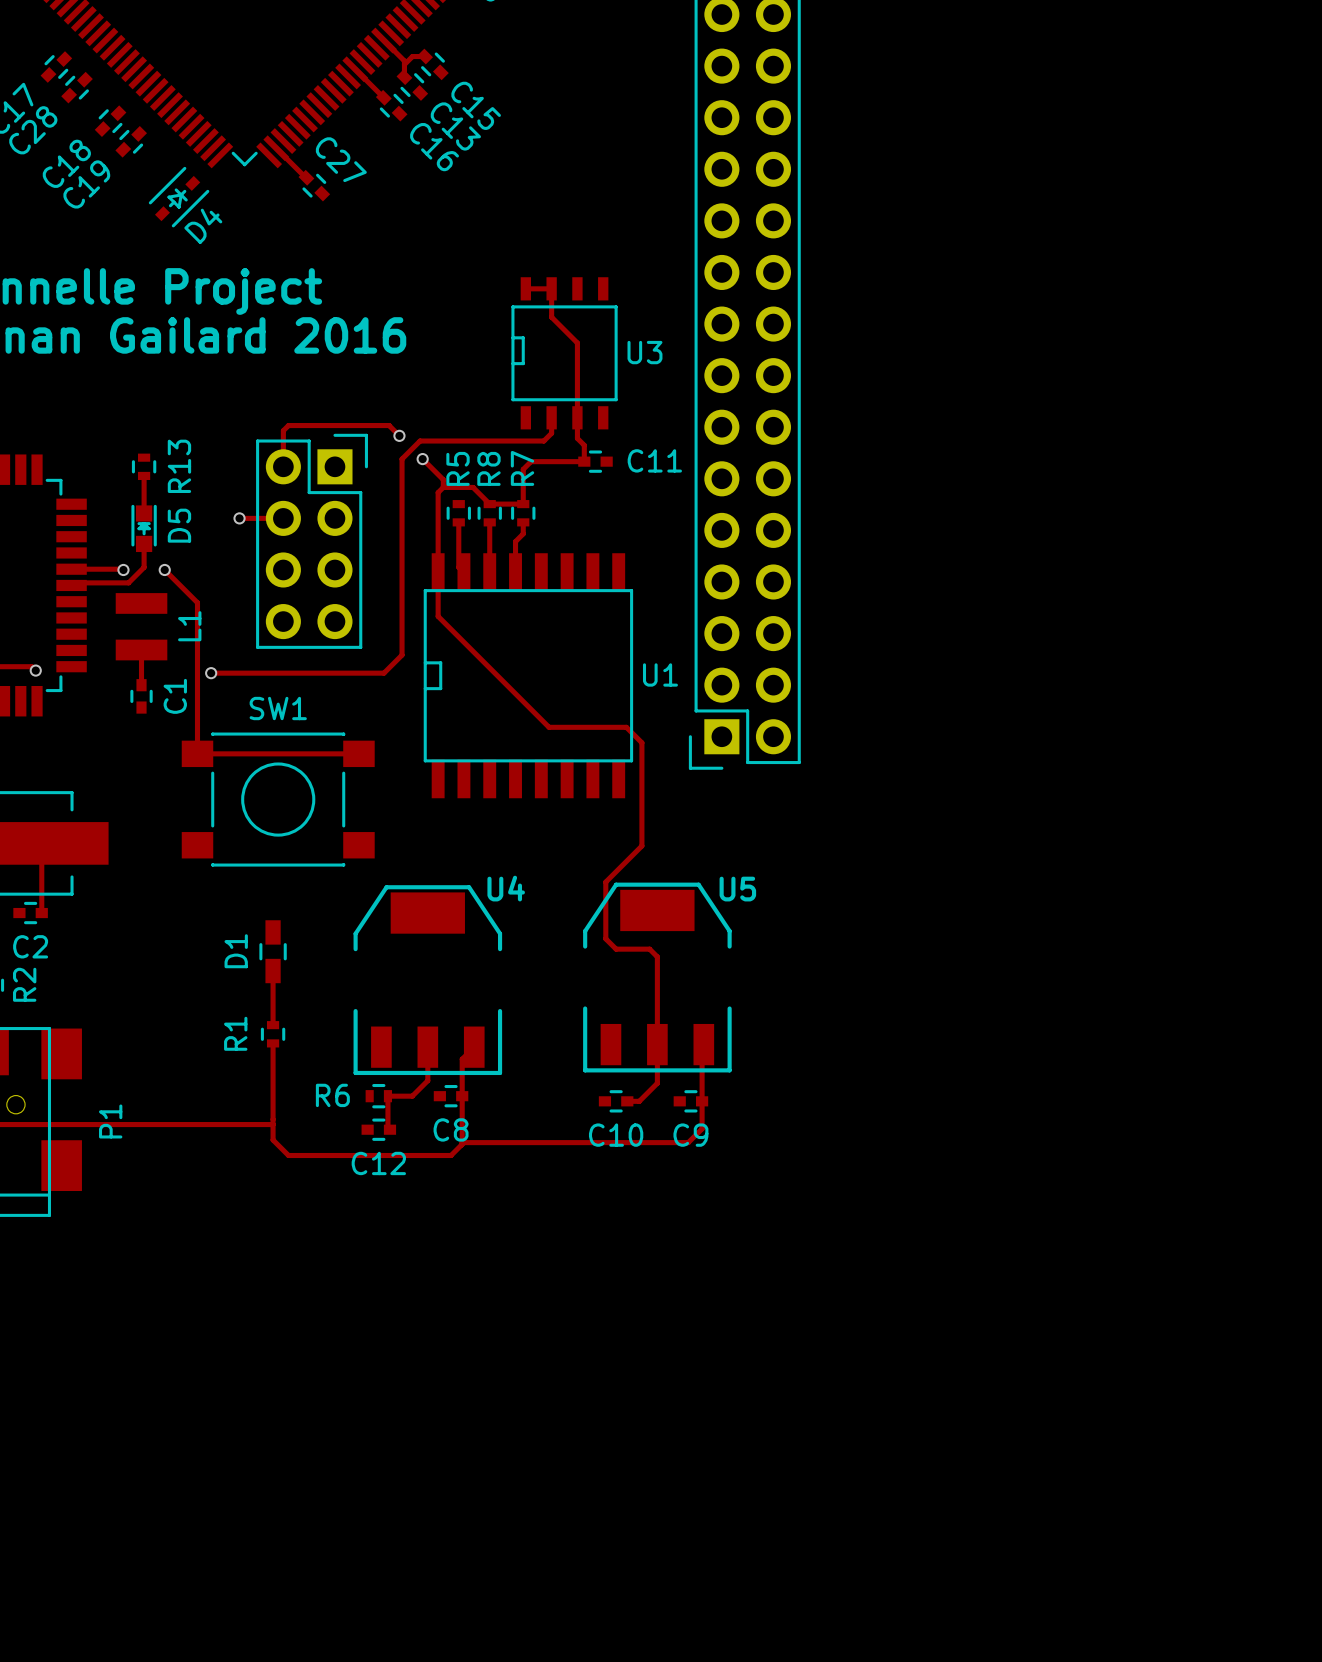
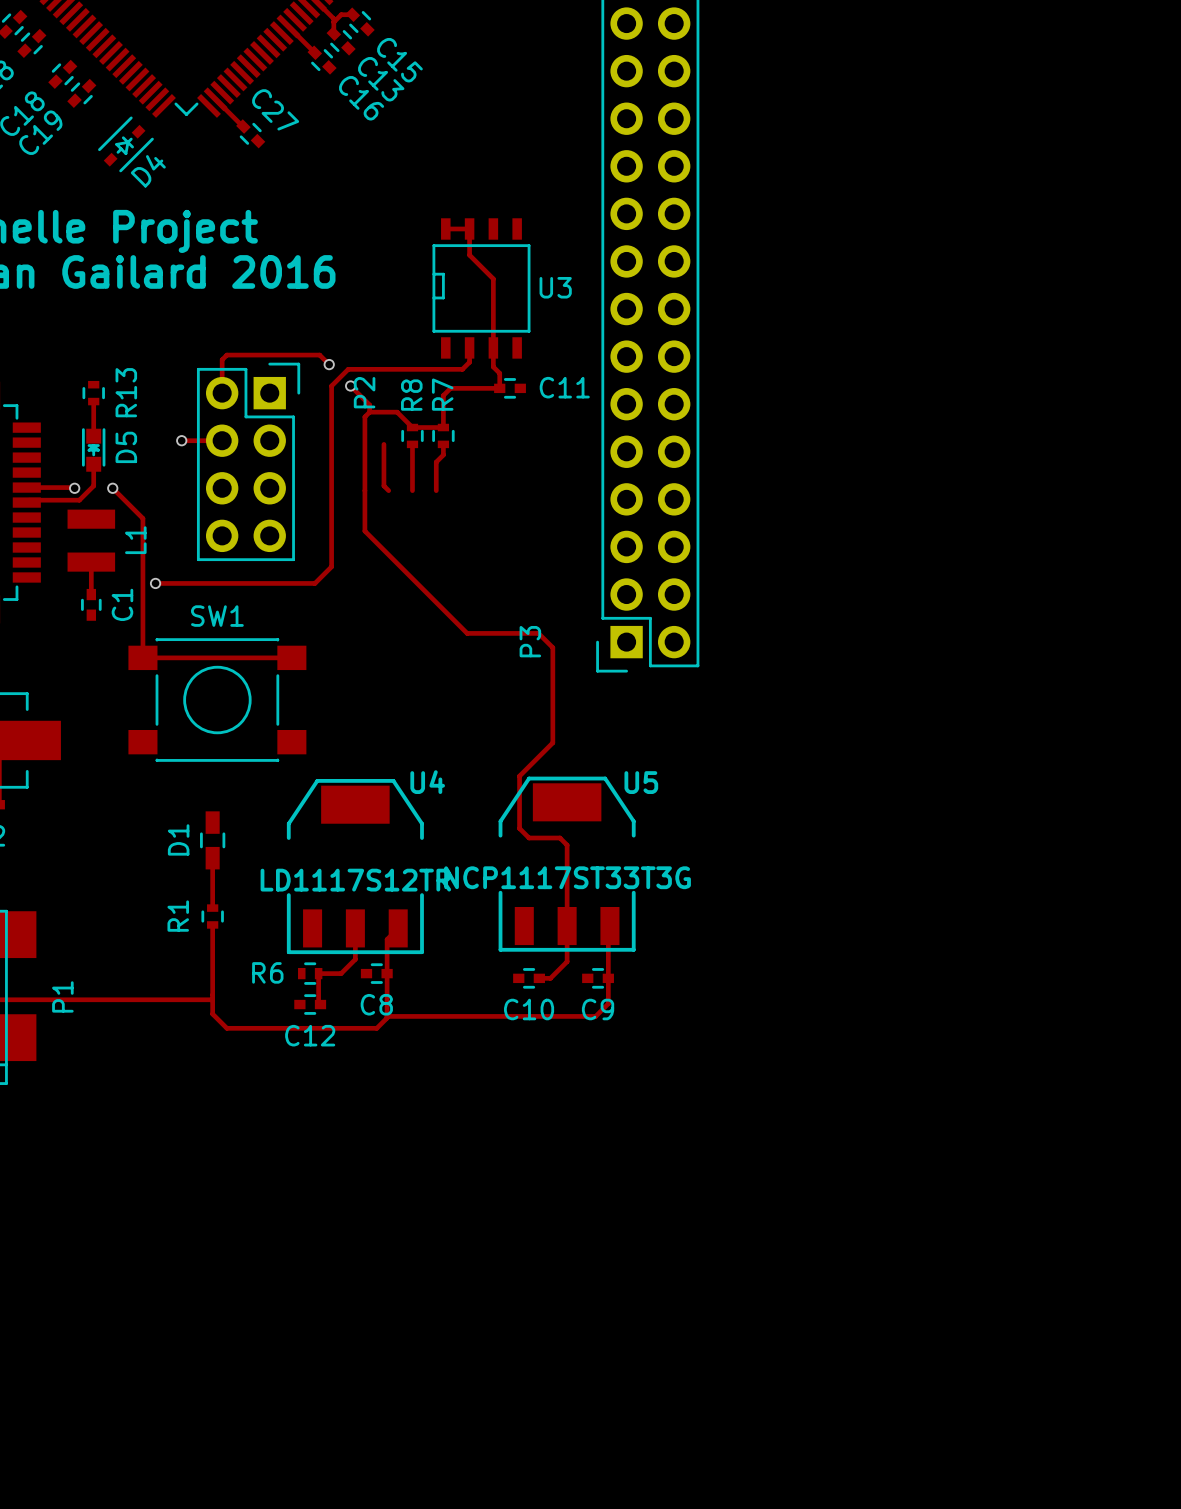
P2 name: none -> P2 (364, 392)
R5: (458, 513) -> none
U1: (528, 675) -> none
P3 name: none -> P3 (530, 641)
U5 value: none -> NCP1117ST33T3G (567, 877)
U4 value: none -> LD1117S12TR (355, 880)

